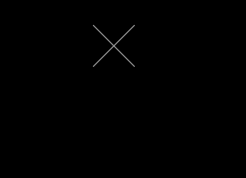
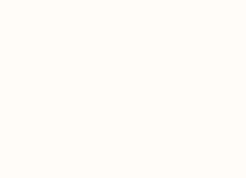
no-connect mark: (113, 45) -> none

